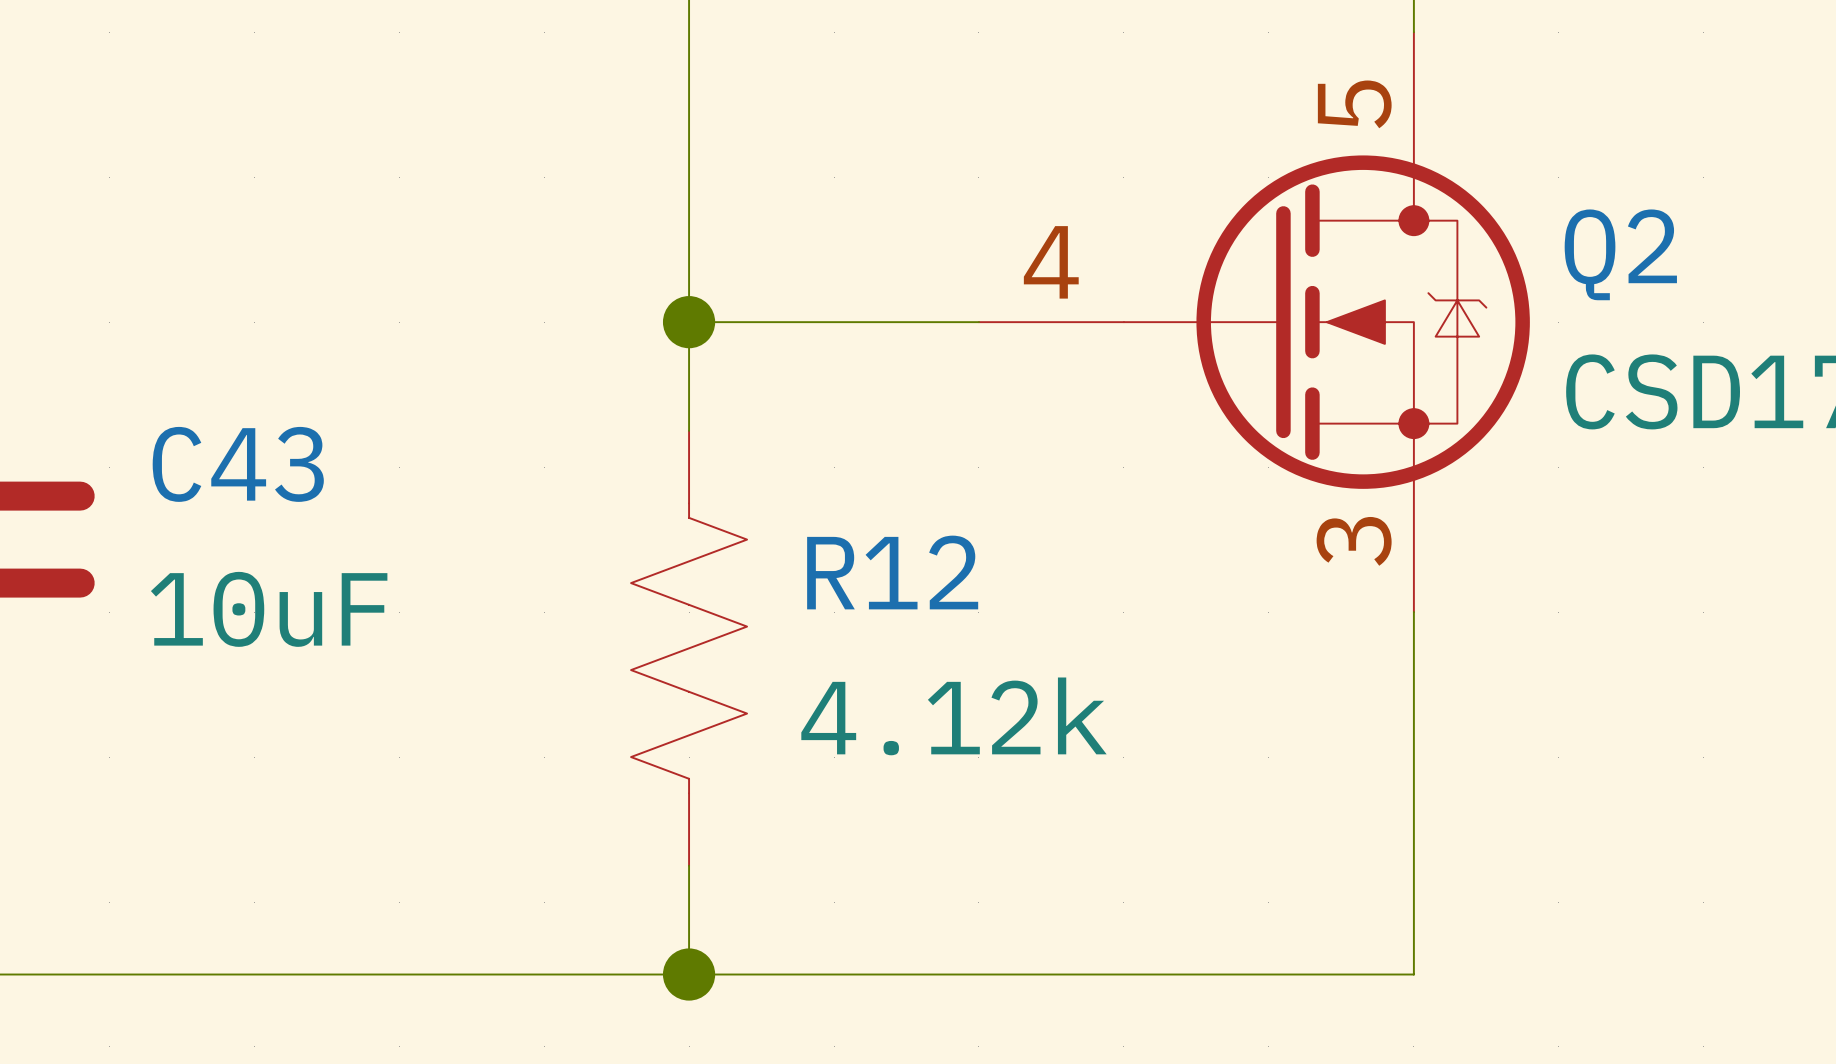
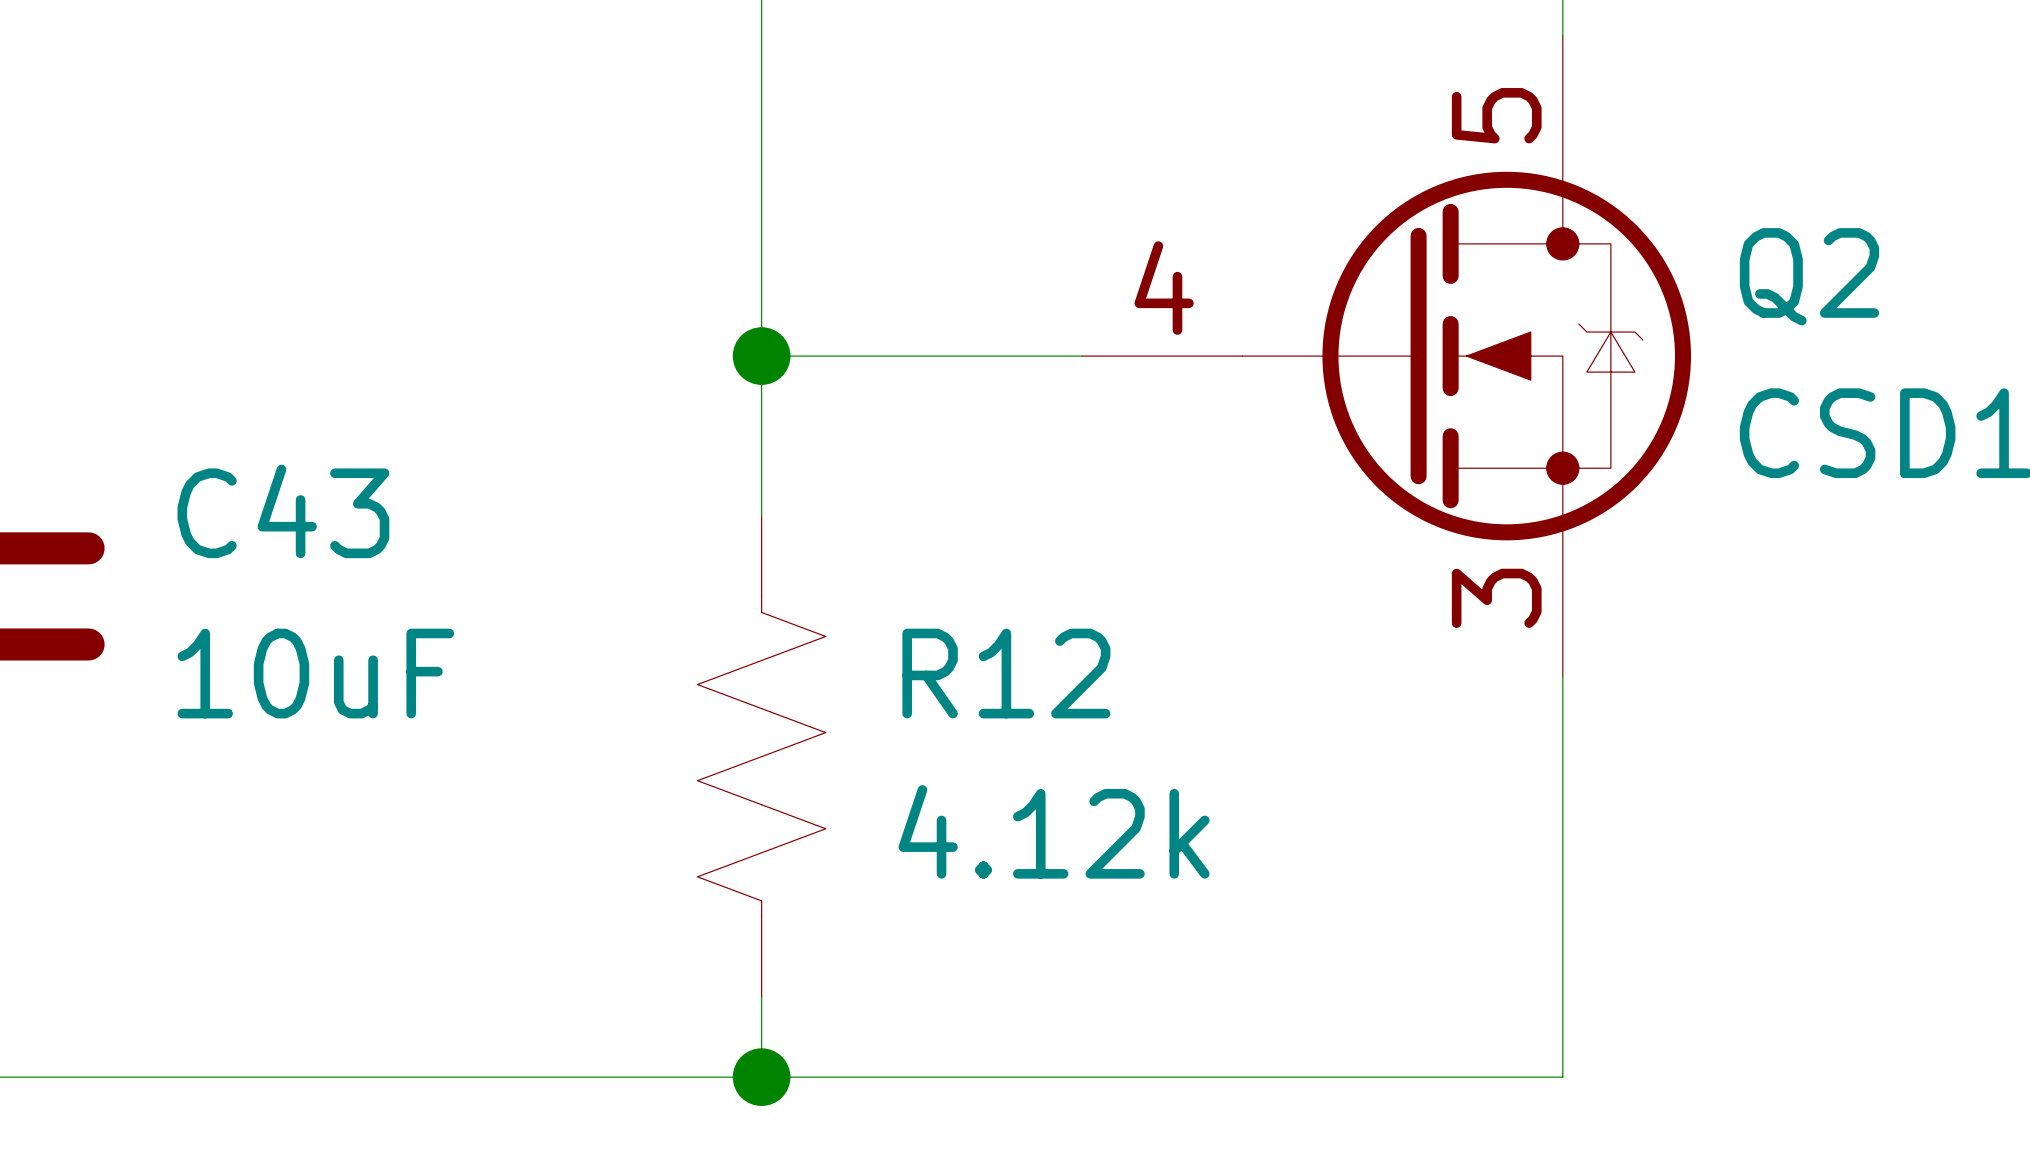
R12 position: (689, 648) -> (761, 756)

